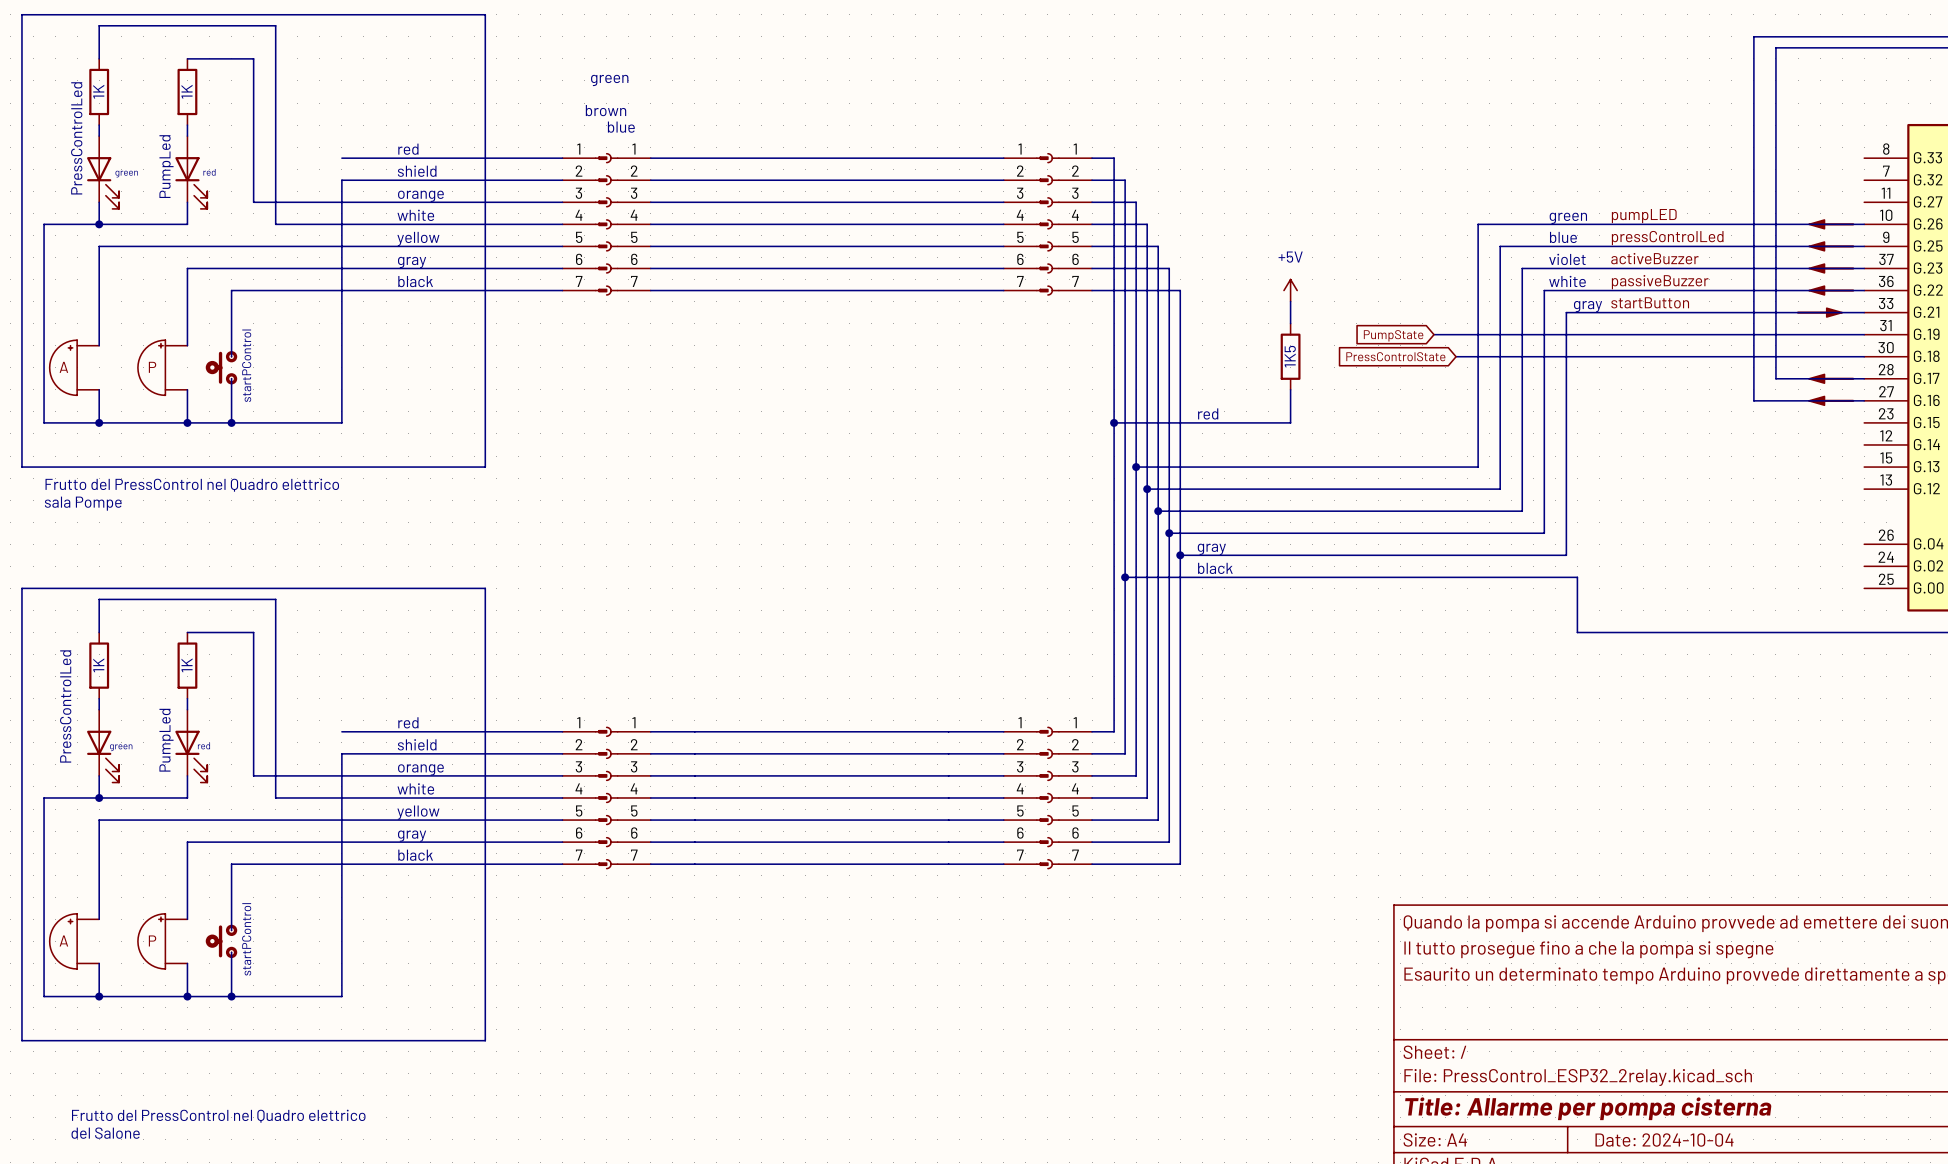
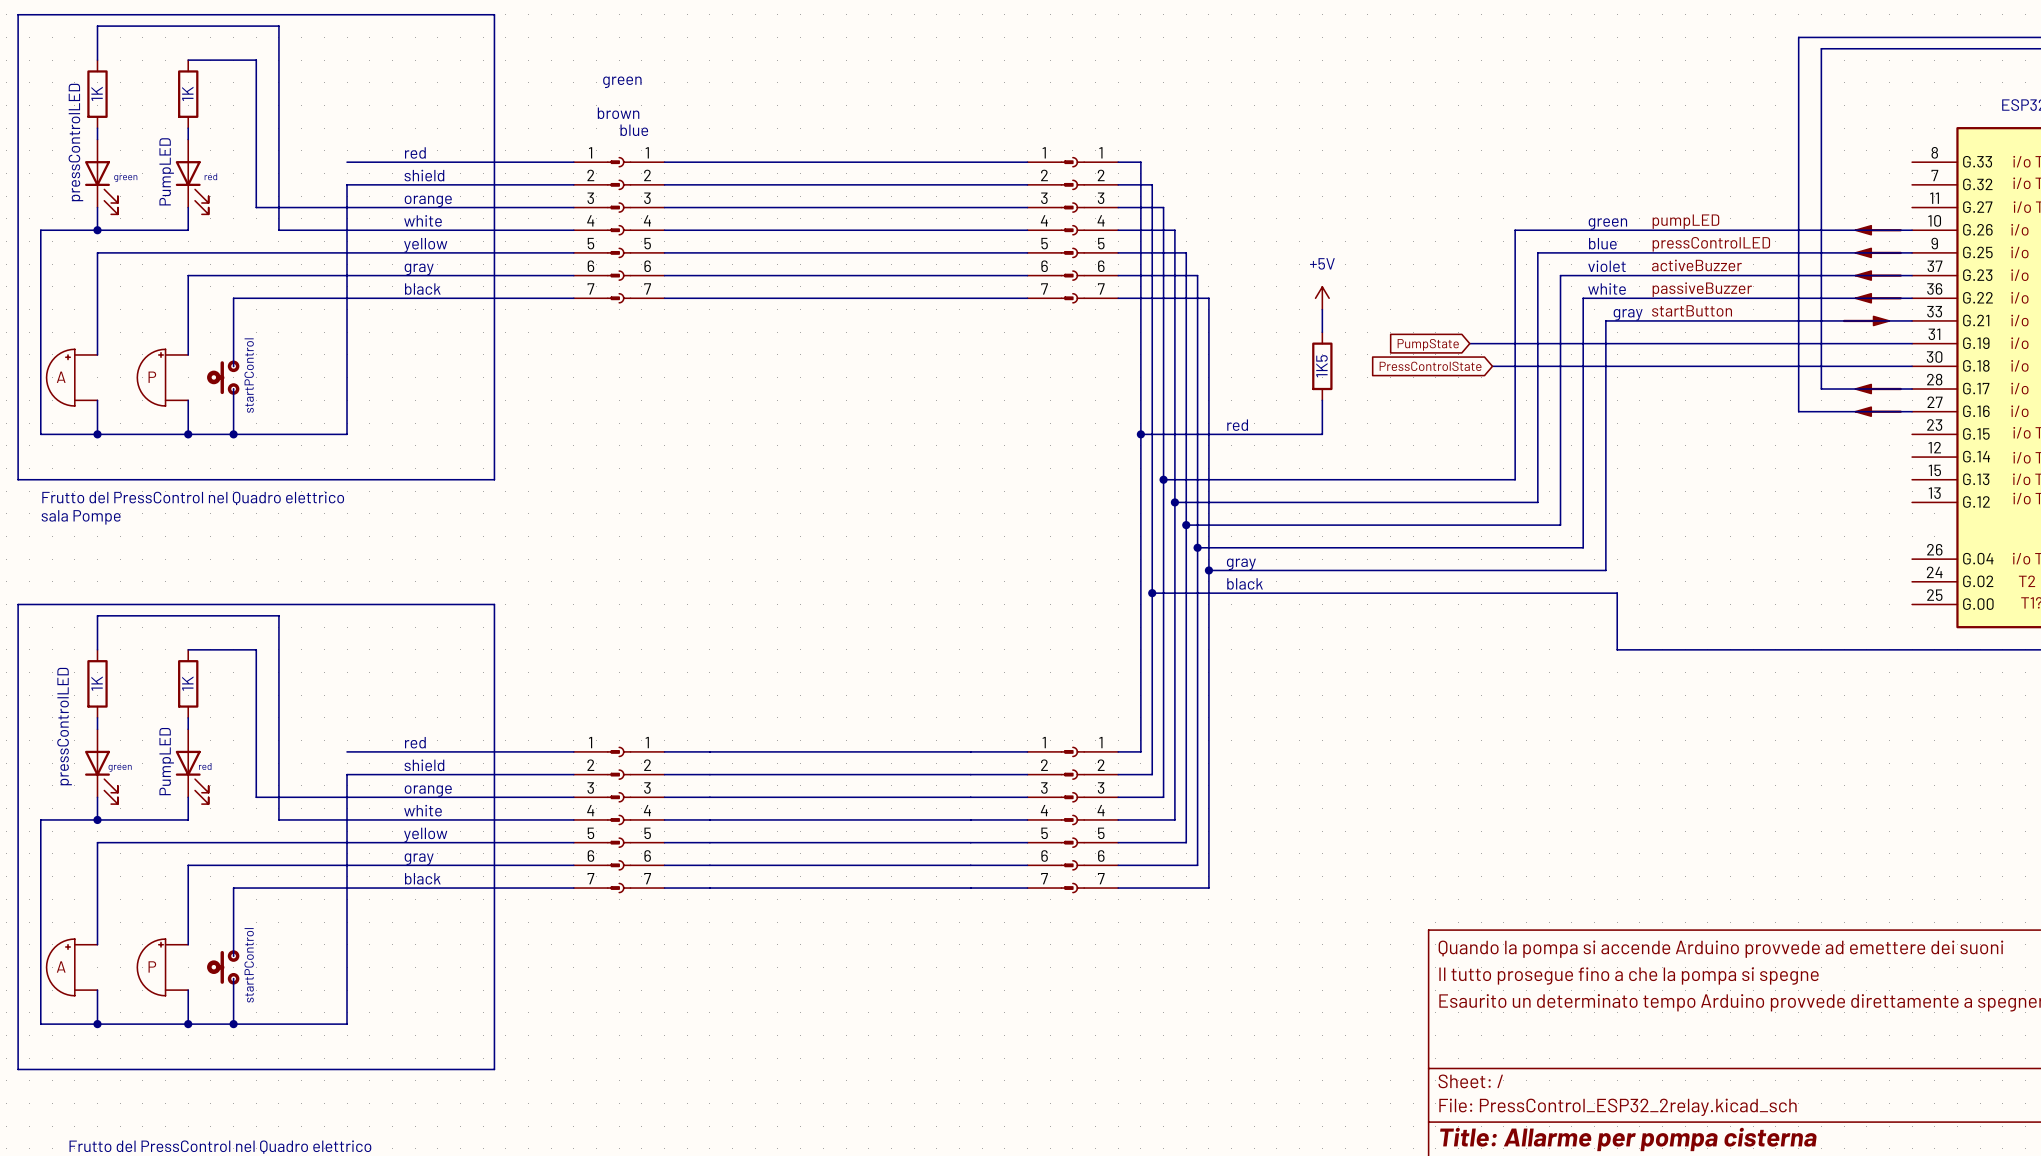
part value: PressControlLed (76, 138) -> pressControlLED (75, 142)
part value: PumpLed (166, 166) -> PumpLED (166, 171)
label: pressControlLed (1667, 238) -> pressControlLED (1711, 244)
part value: PressControlLed (65, 706) -> pressControlLED (64, 726)
part value: PumpLed (166, 740) -> PumpLED (166, 761)

